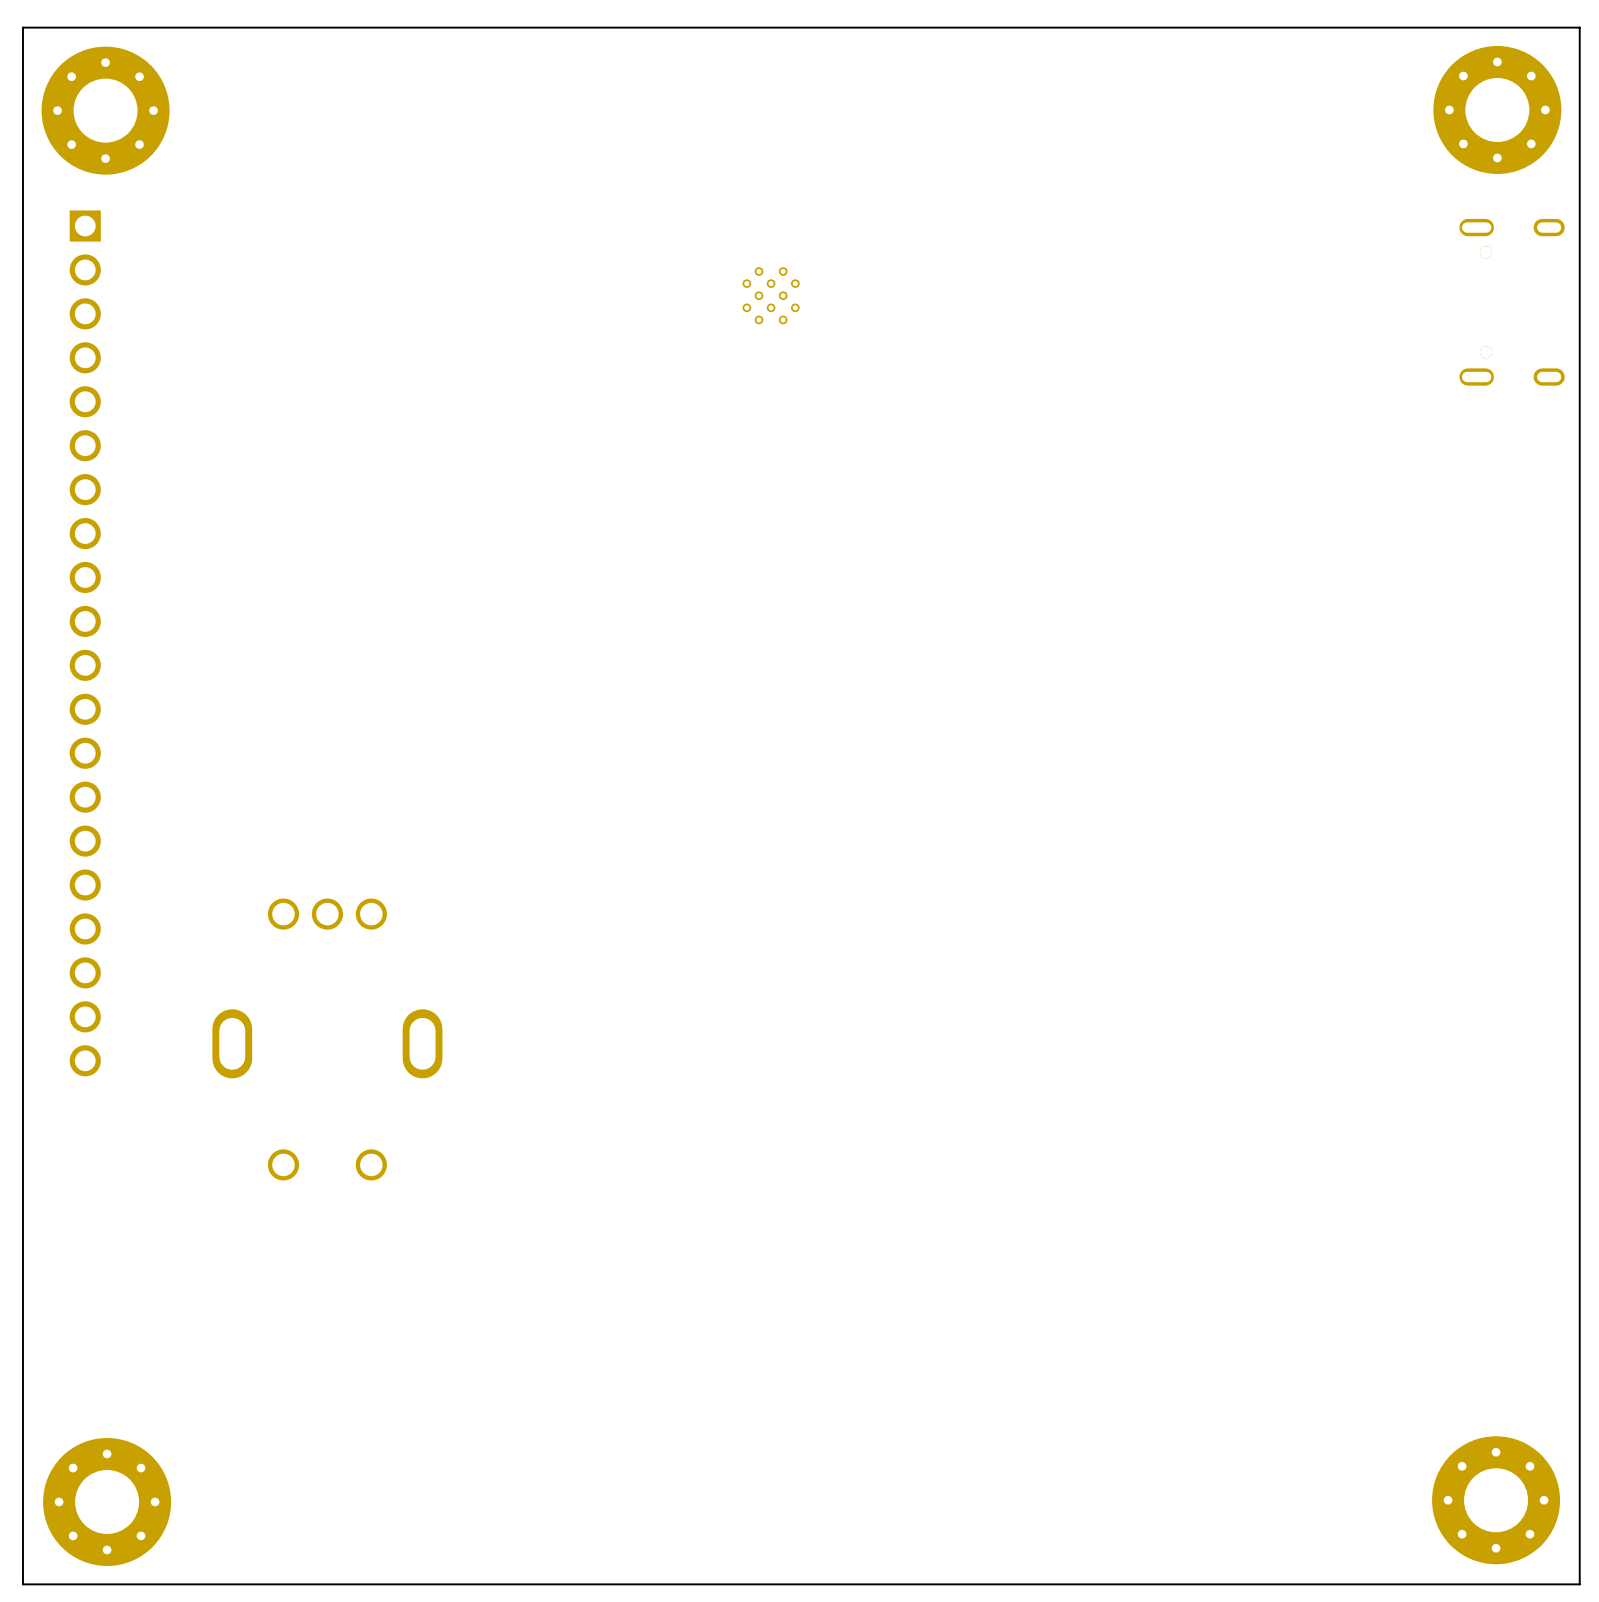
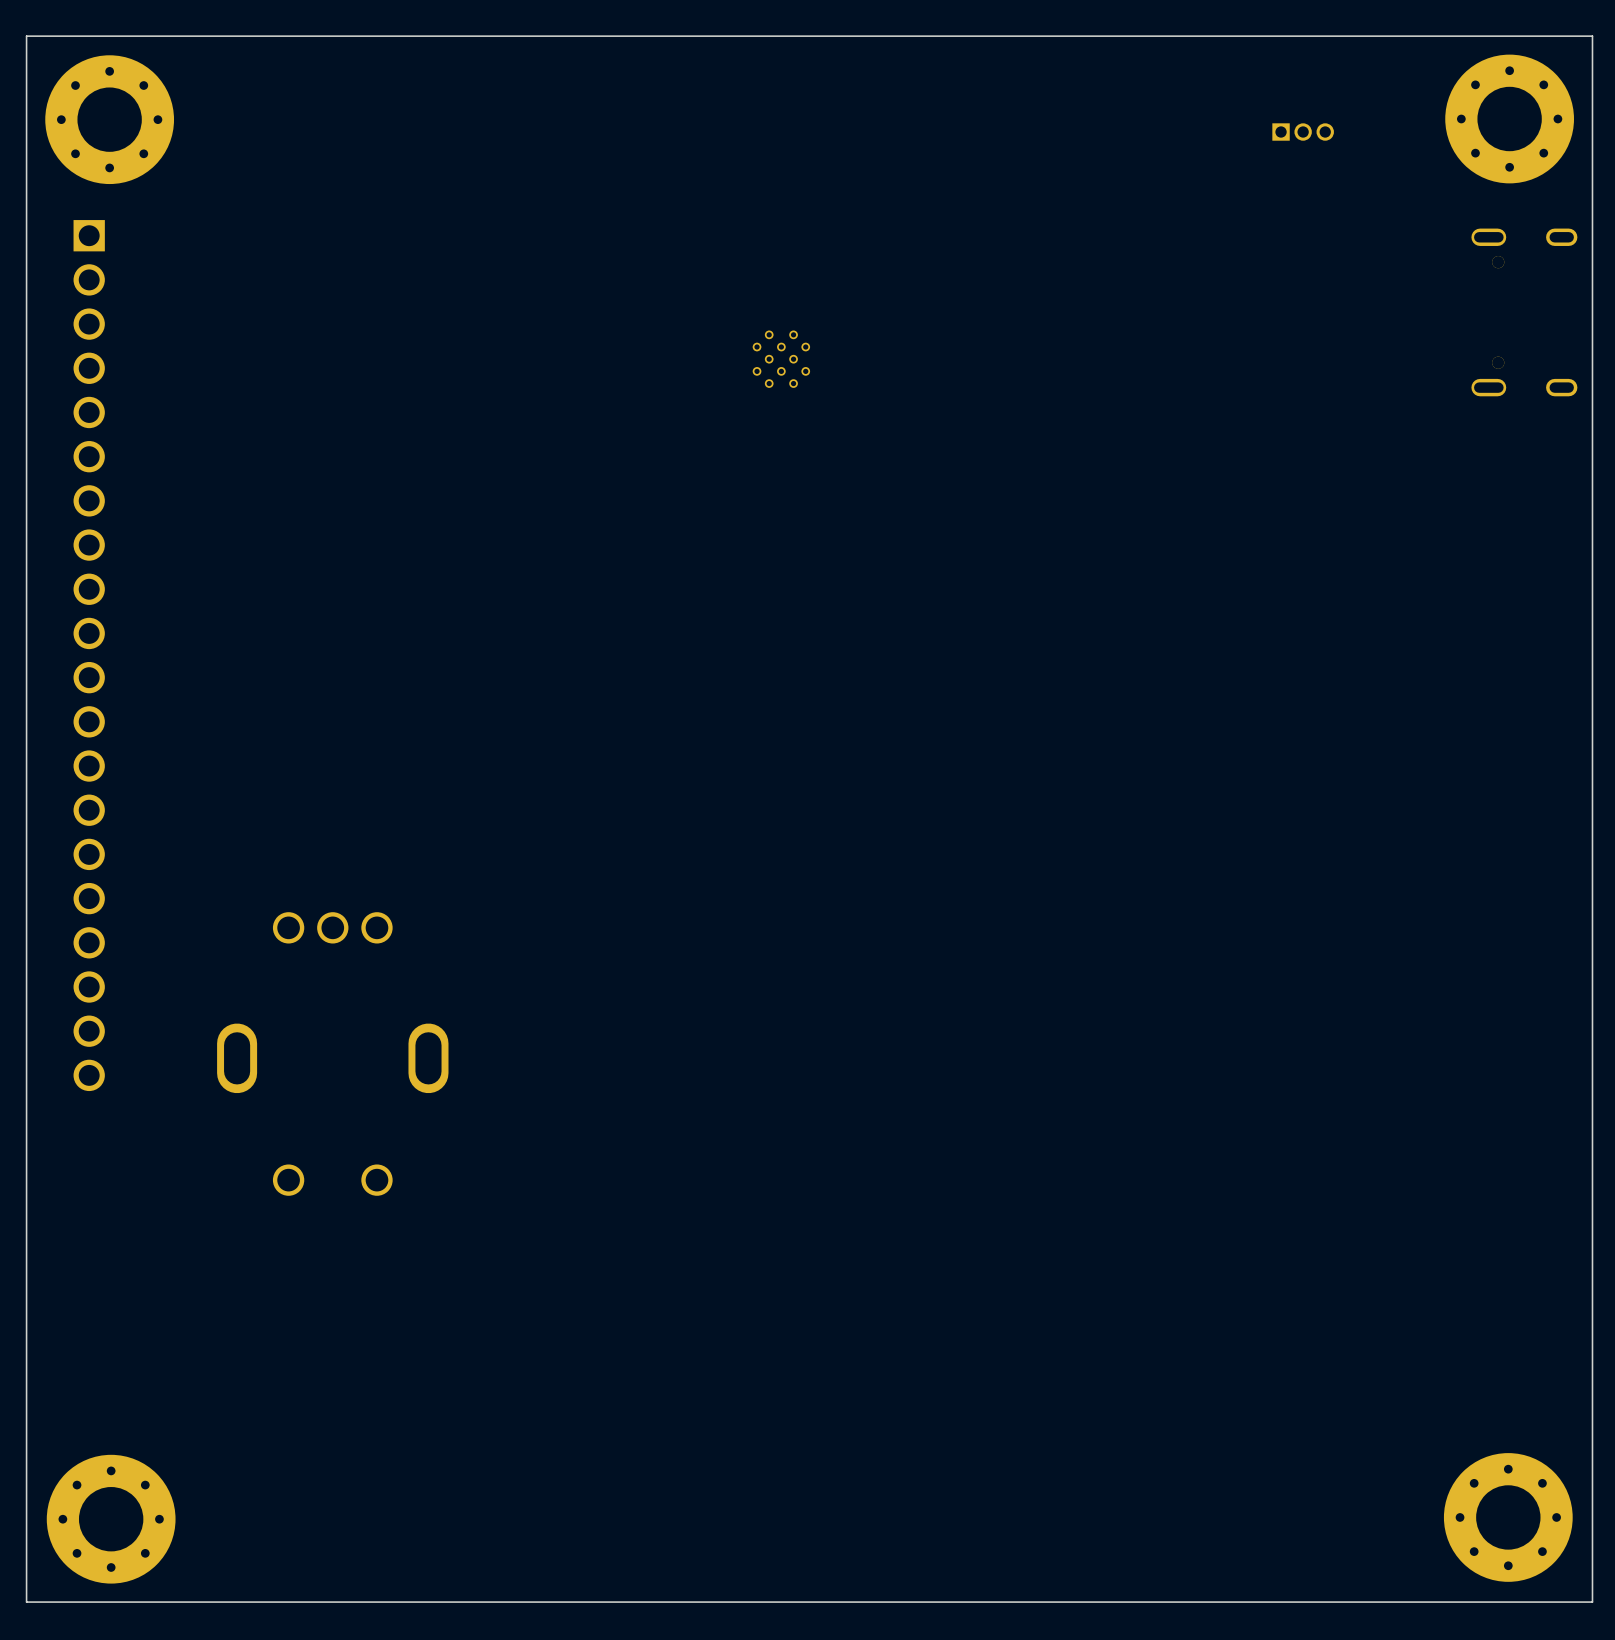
part: none -> (1303, 132)
part position: (771, 295) -> (781, 359)

